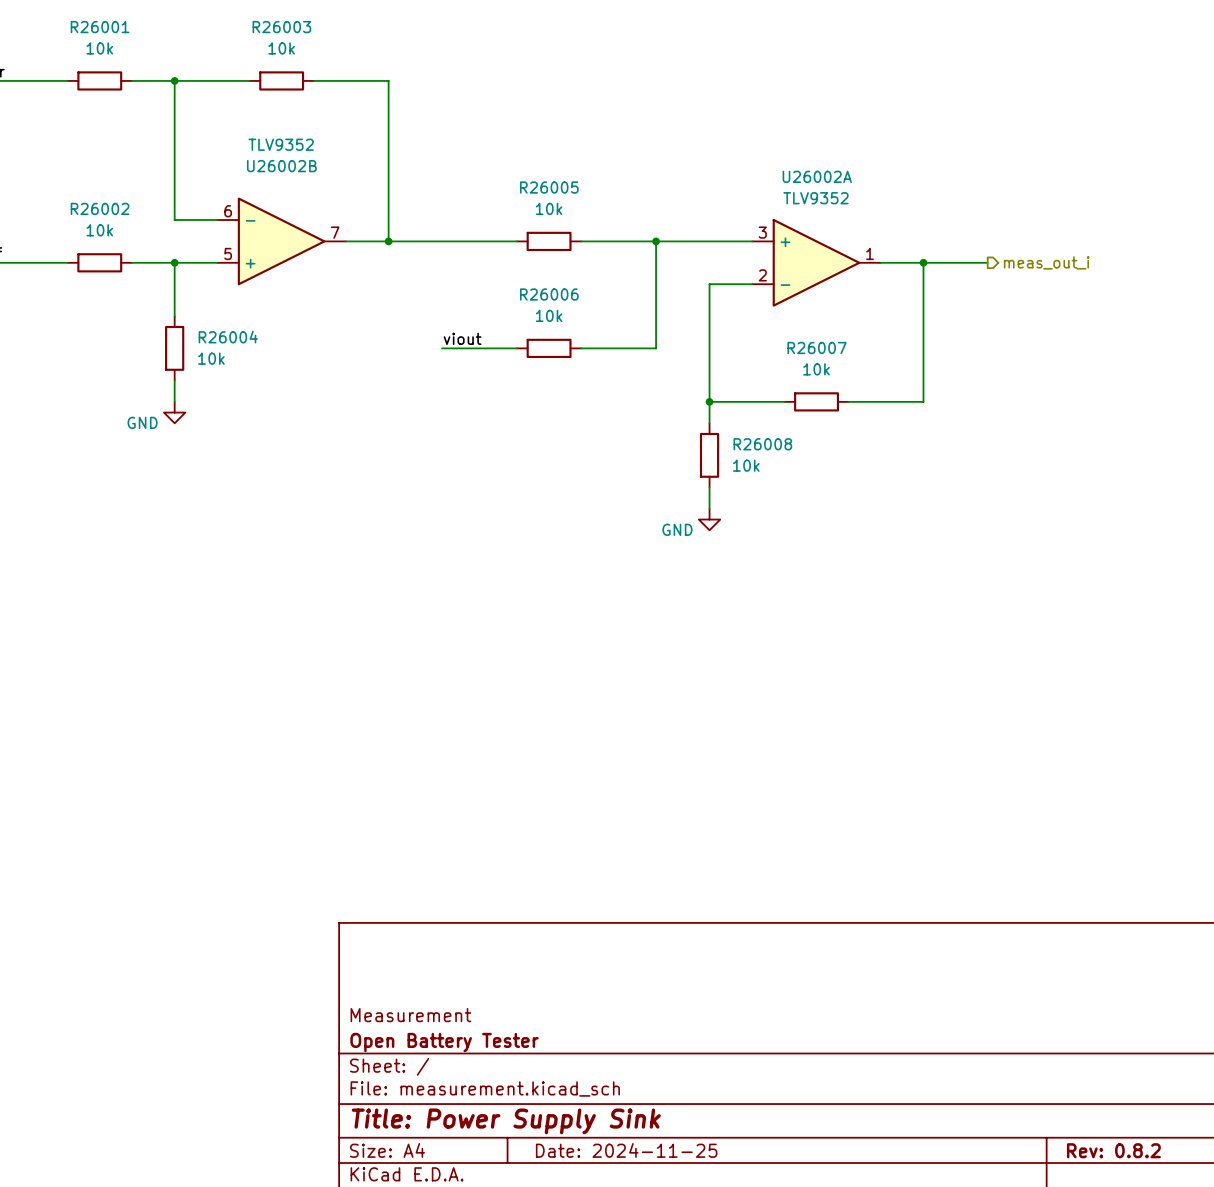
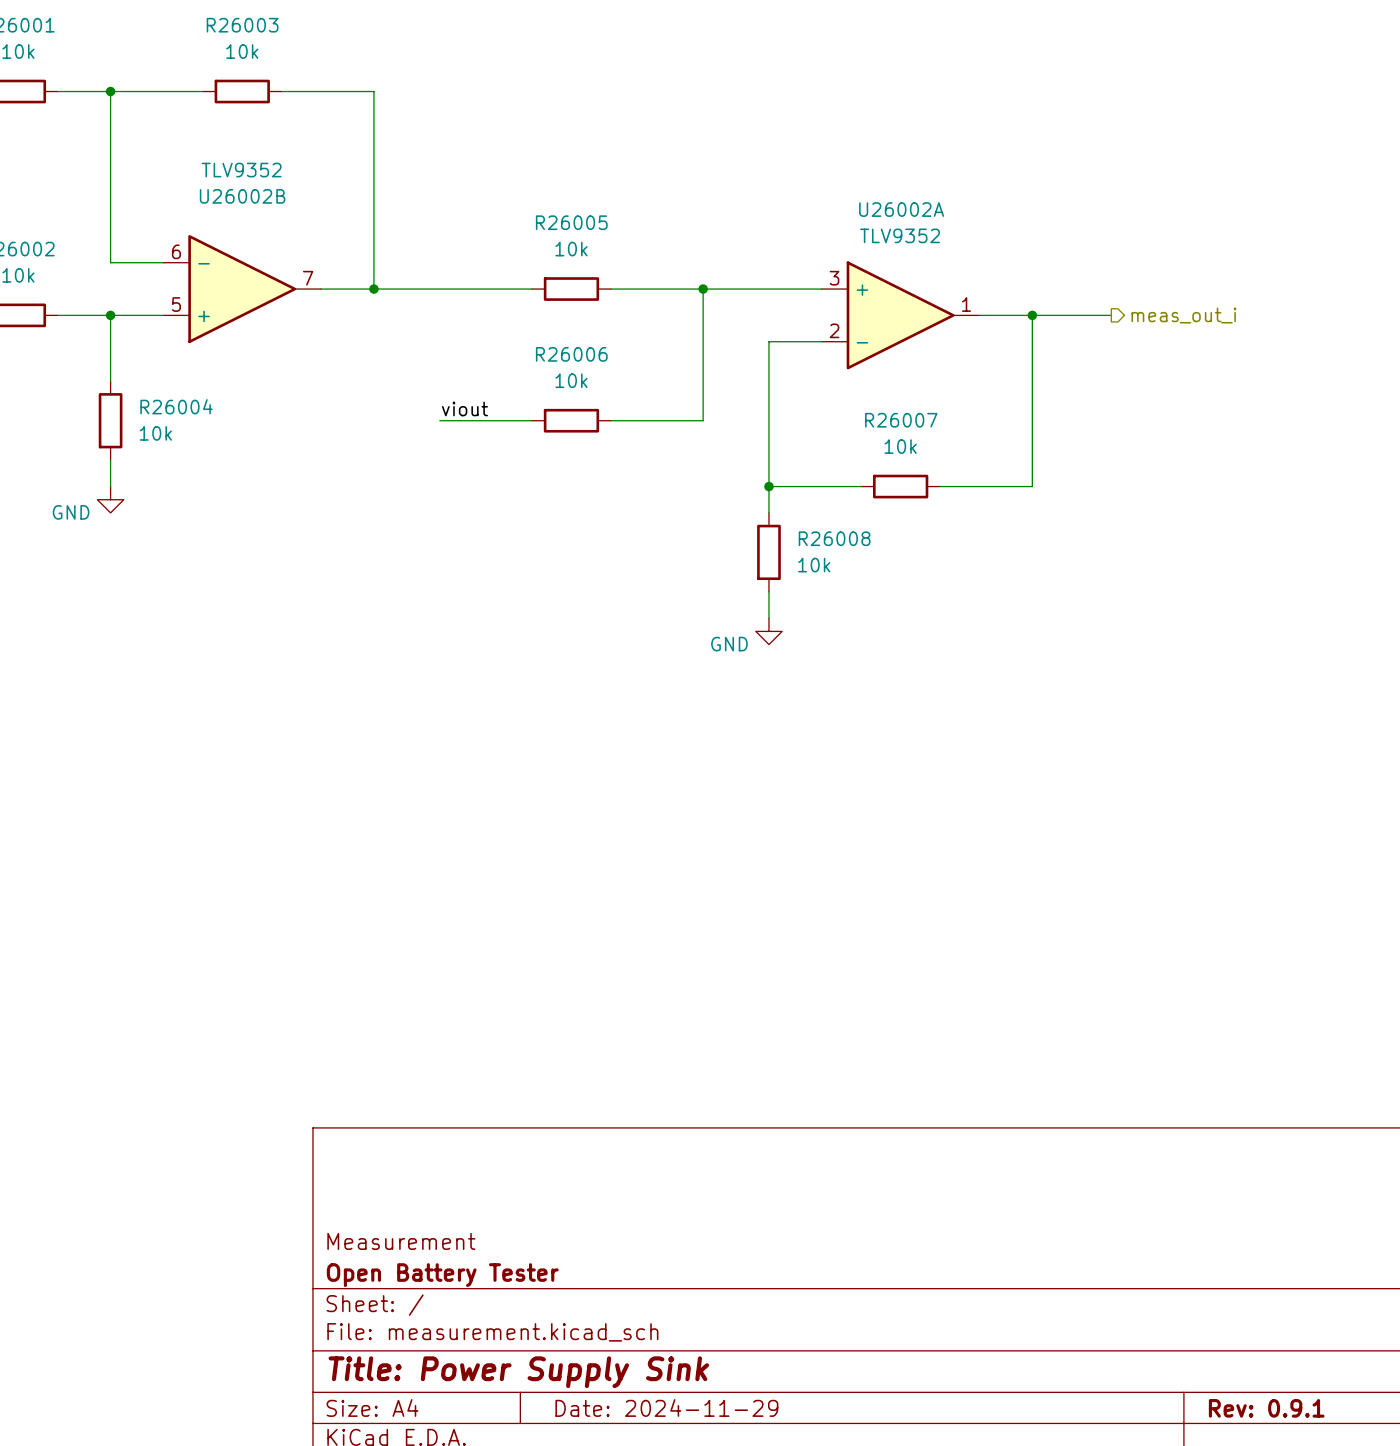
title block: Date: 2024-11-25 (626, 1150) -> Date: 2024-11-29 (666, 1407)
title block: Rev: 0.8.2 (1113, 1150) -> Rev: 0.9.1 (1266, 1408)

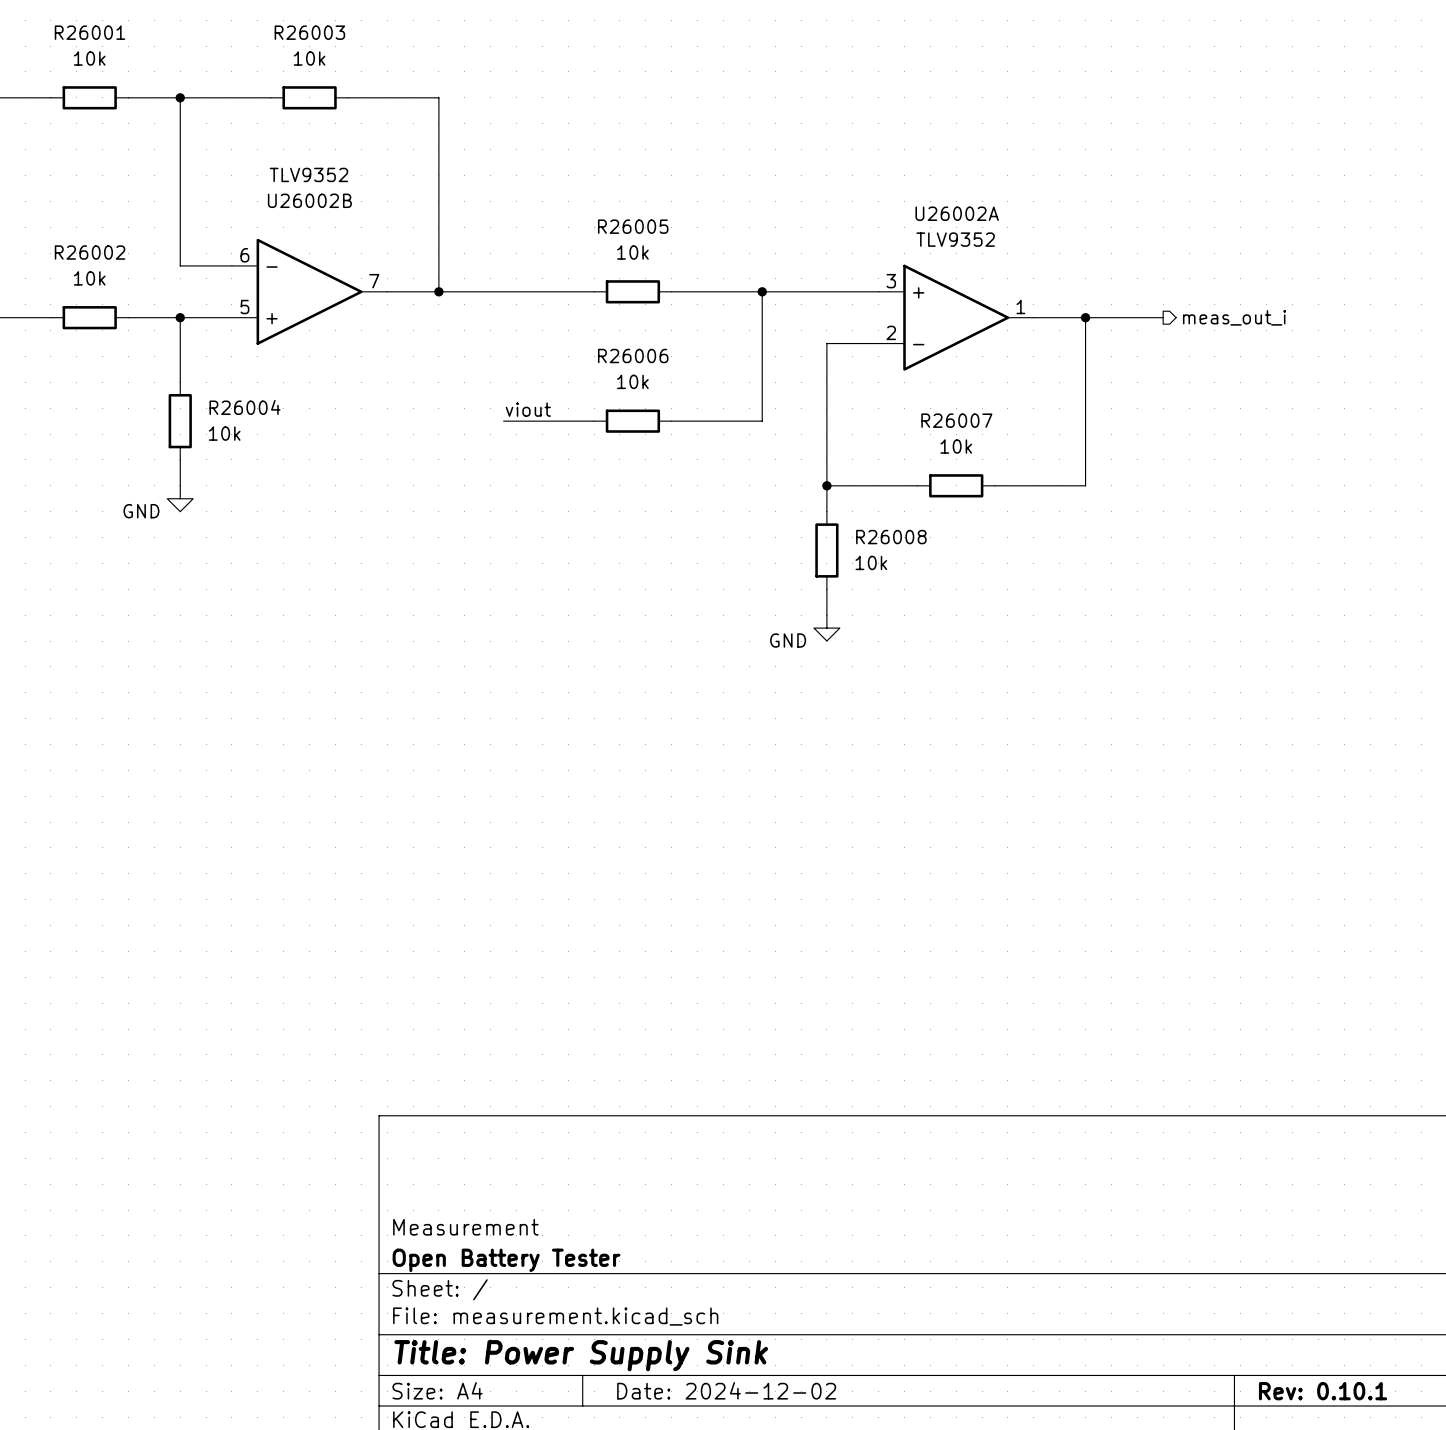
title block: Date: 2024-11-29 (666, 1407) -> Date: 2024-12-02 (726, 1390)
title block: Rev: 0.9.1 (1266, 1408) -> Rev: 0.10.1 (1323, 1391)

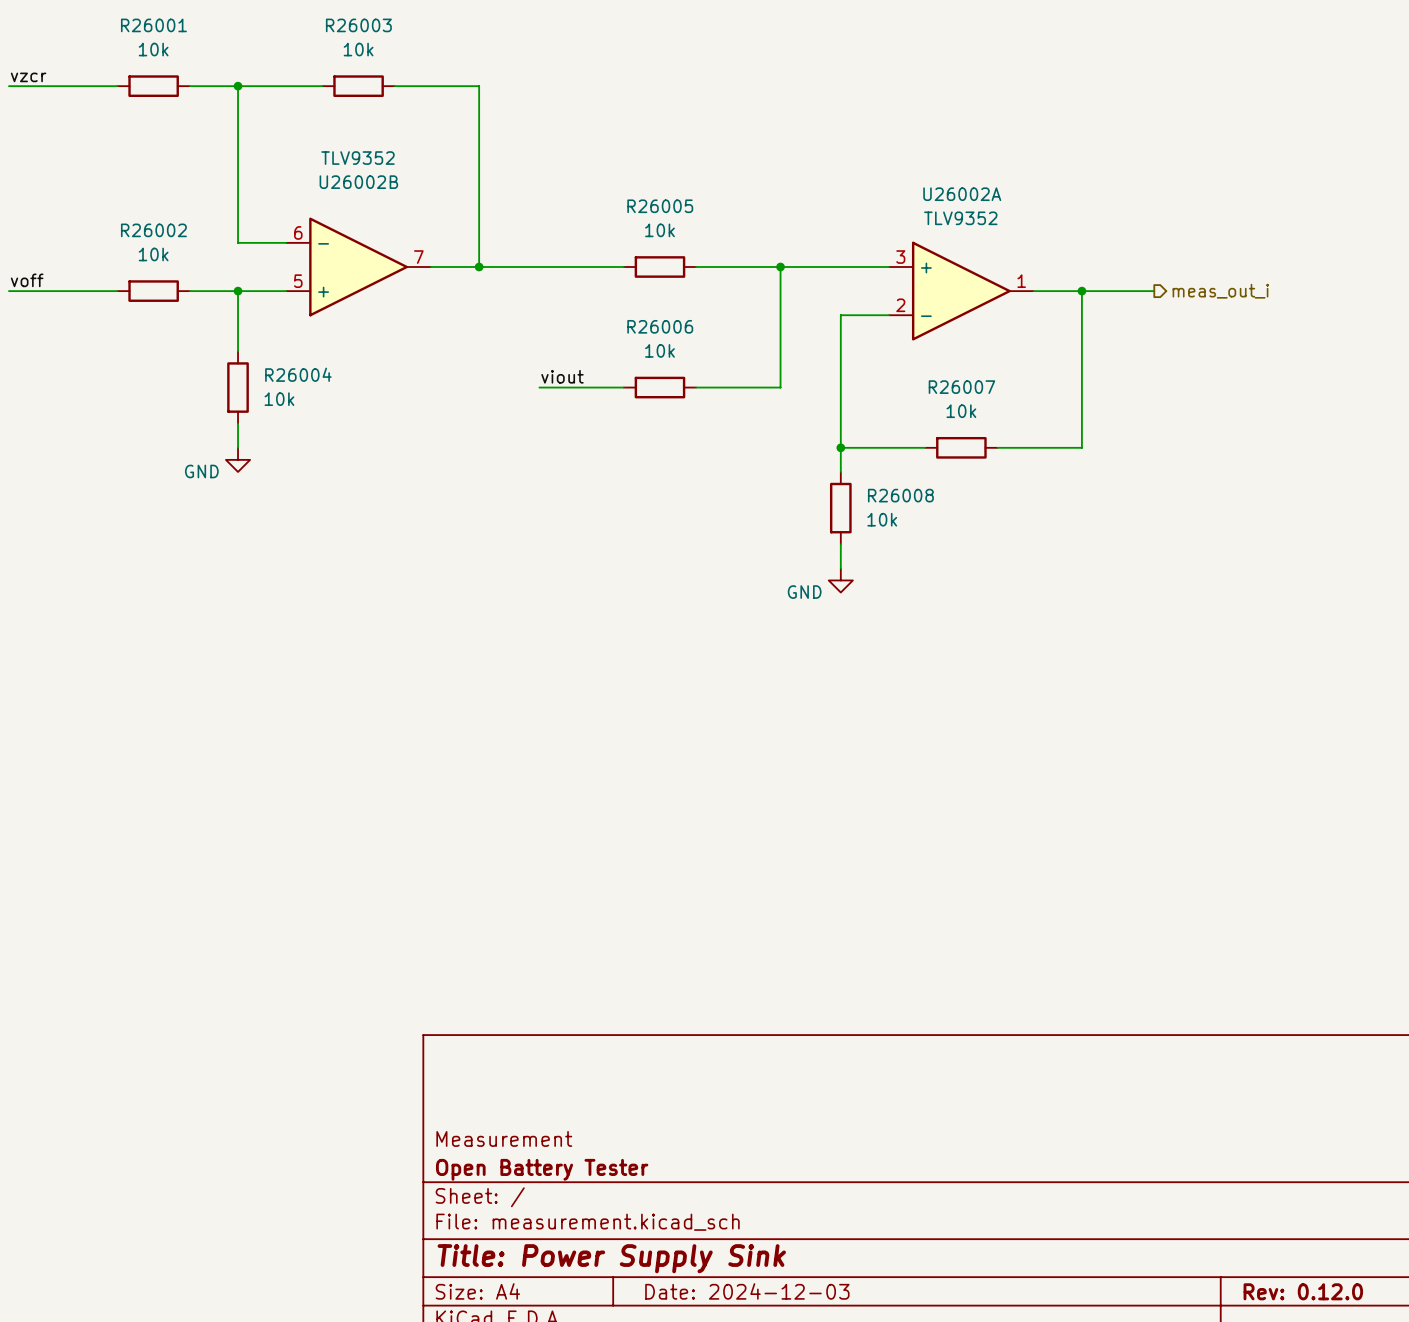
title block: Date: 2024-12-02 (726, 1390) -> Date: 2024-12-03 (747, 1291)
title block: Rev: 0.10.1 (1323, 1391) -> Rev: 0.12.0 (1303, 1291)

